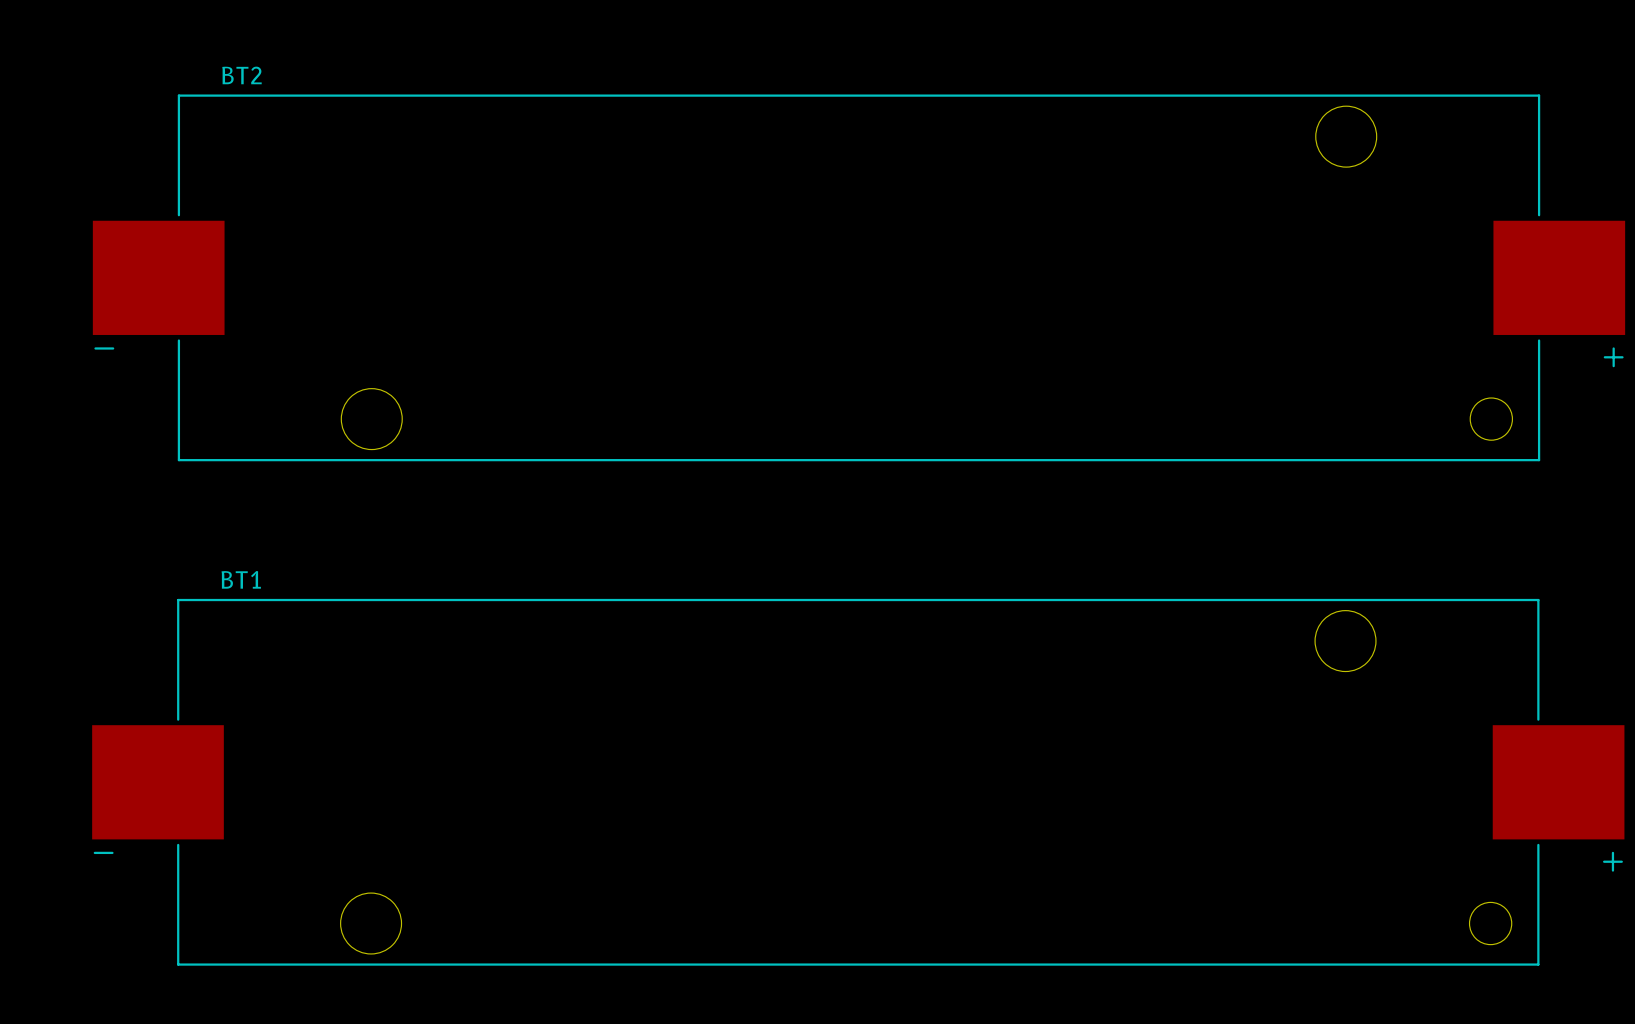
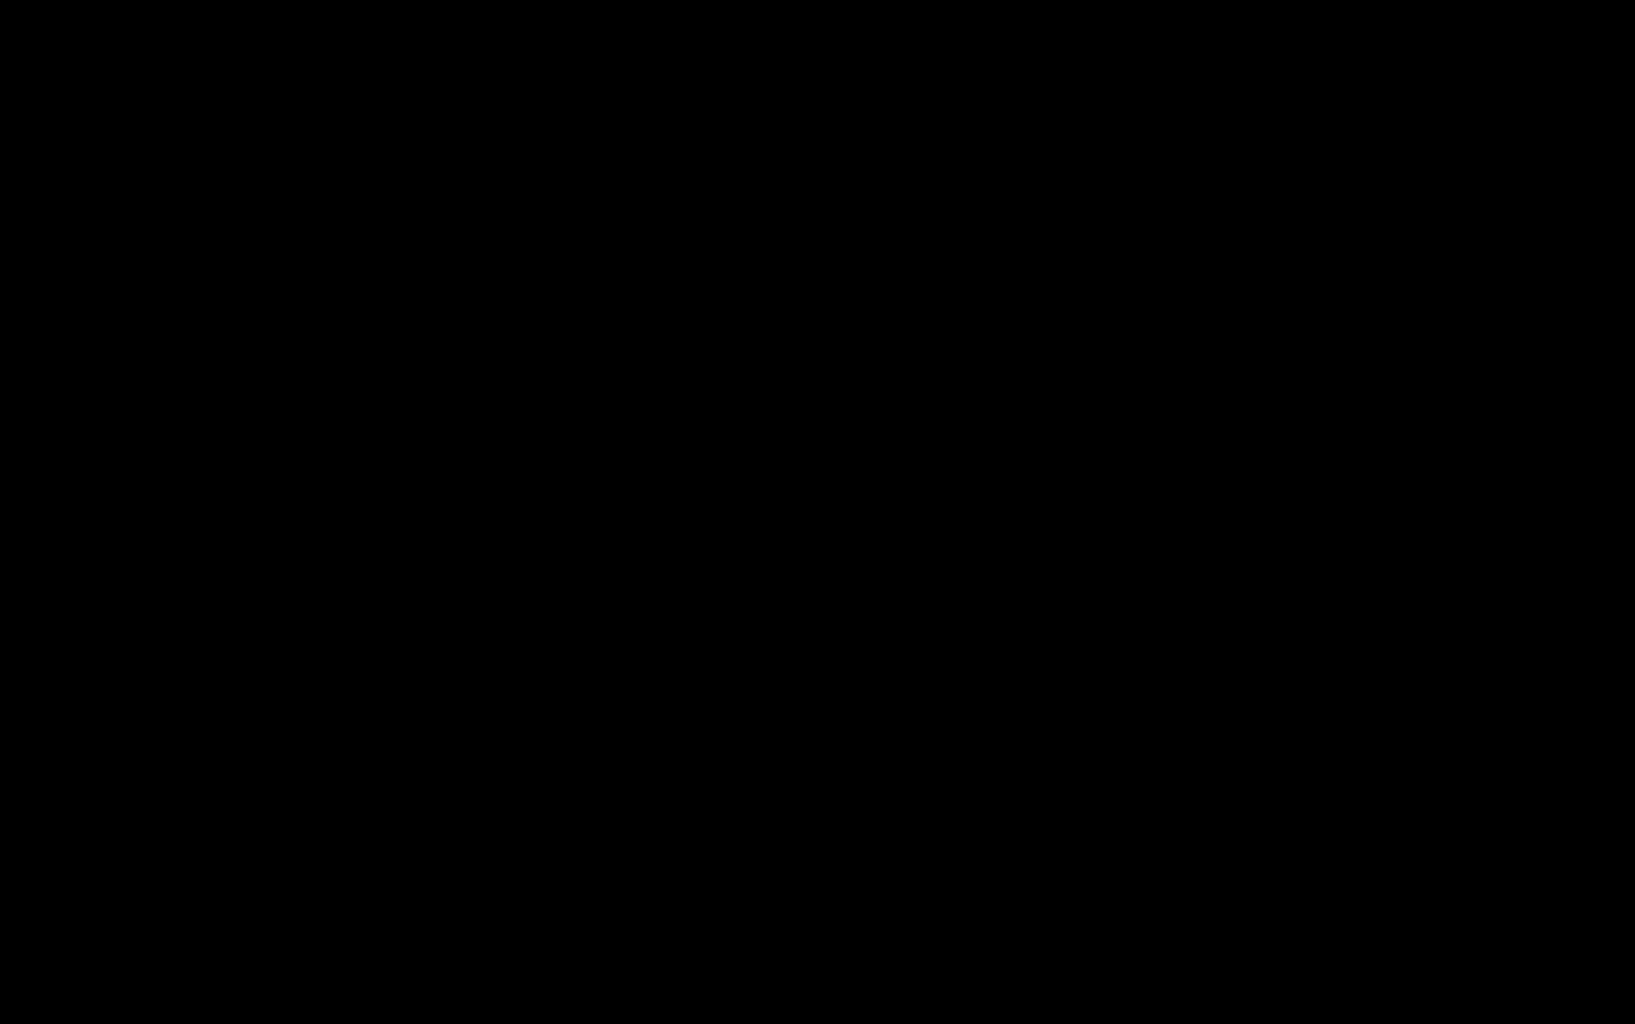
BT2: (859, 277) -> none
BT1: (858, 782) -> none

